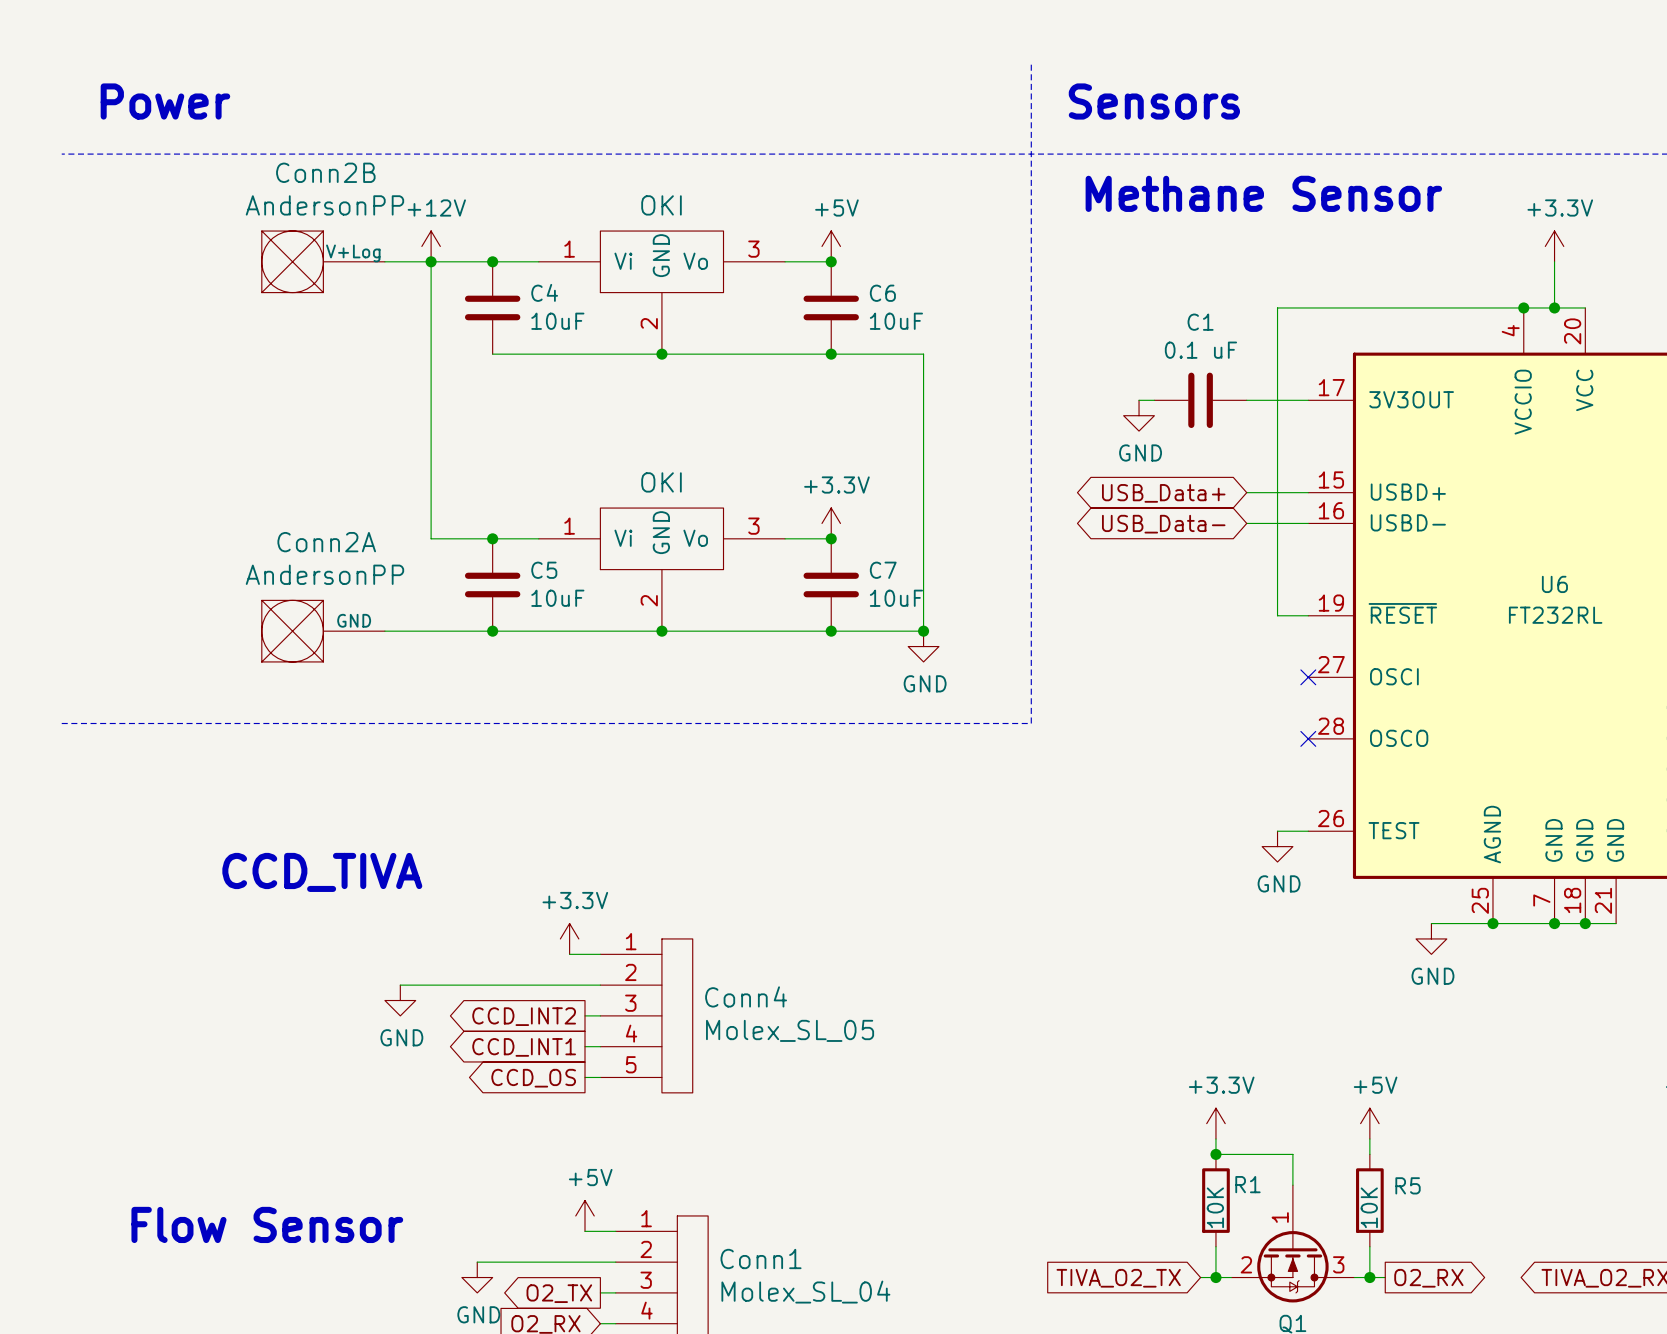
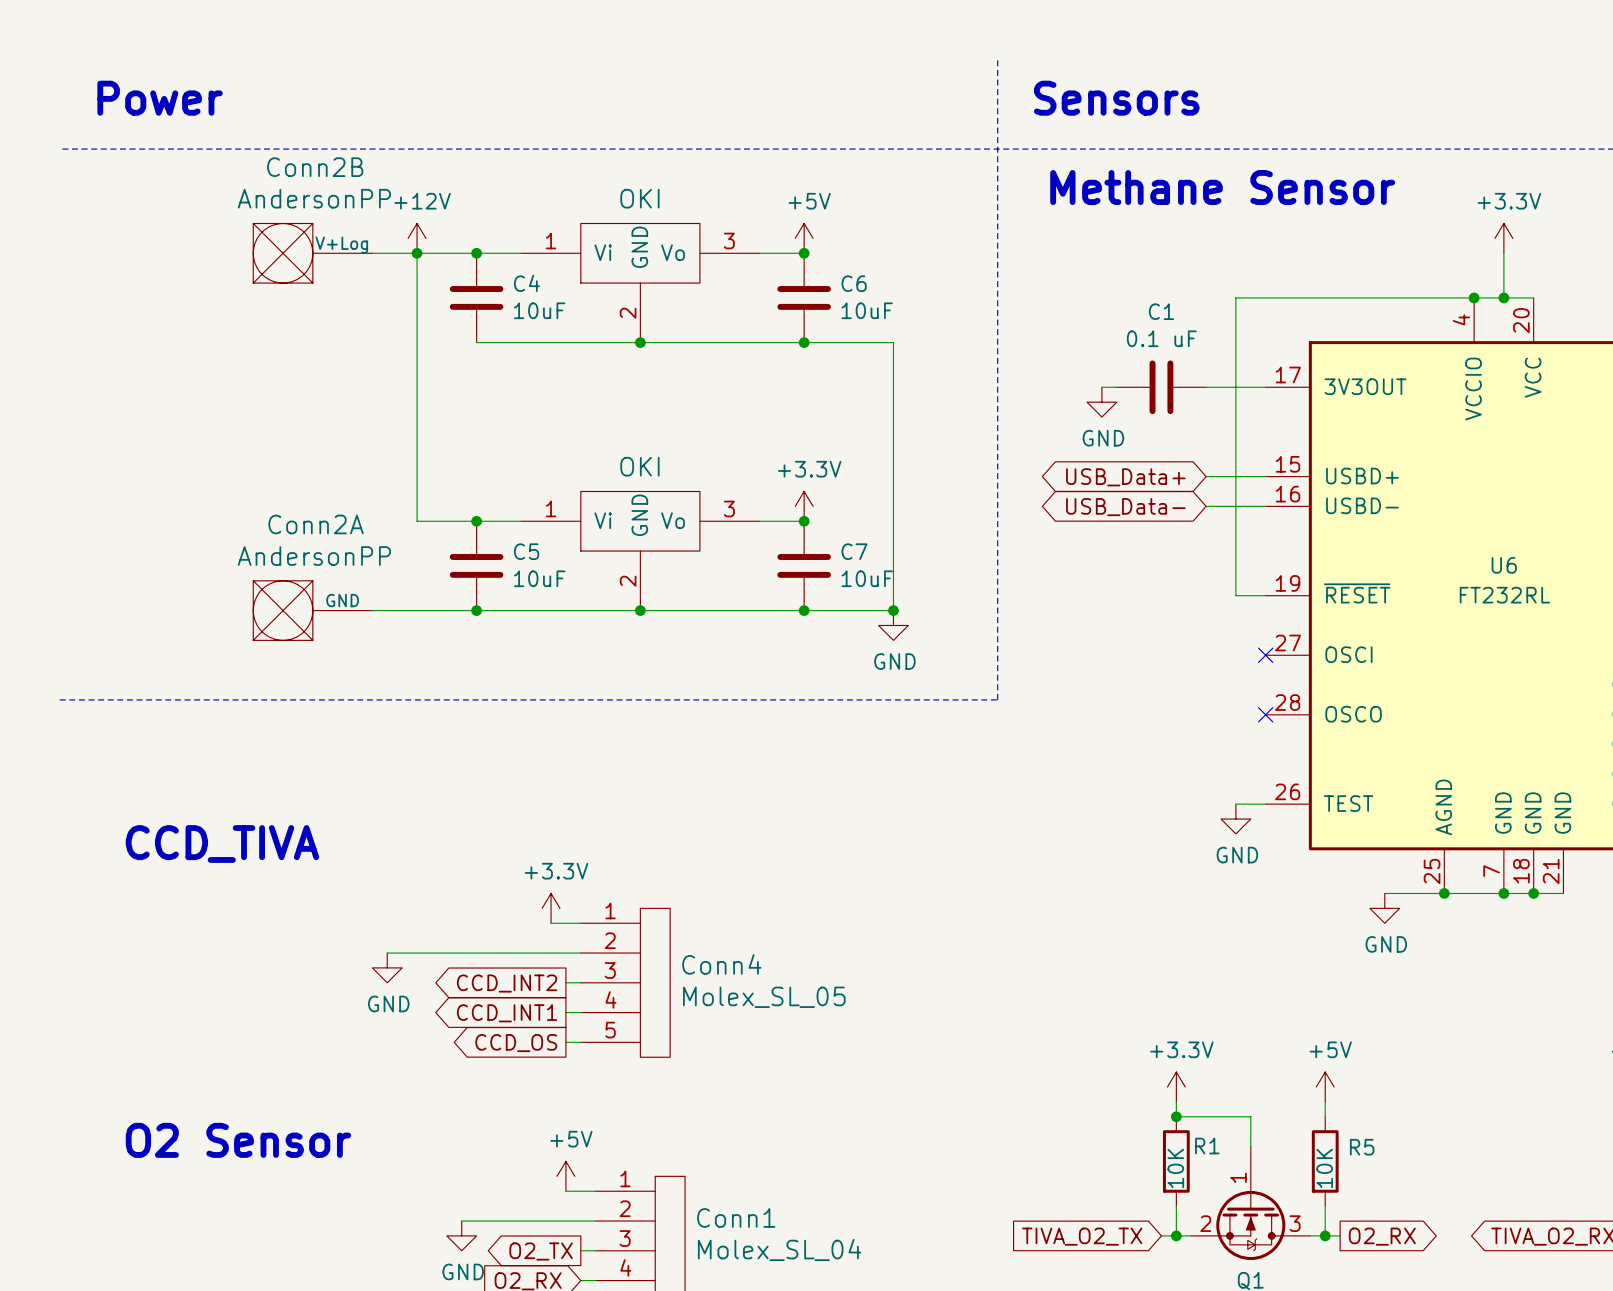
text position: CCD_TIVA (322, 872) -> CCD_TIVA (222, 843)
text: Flow Sensor (267, 1224) -> O2 Sensor (238, 1140)

